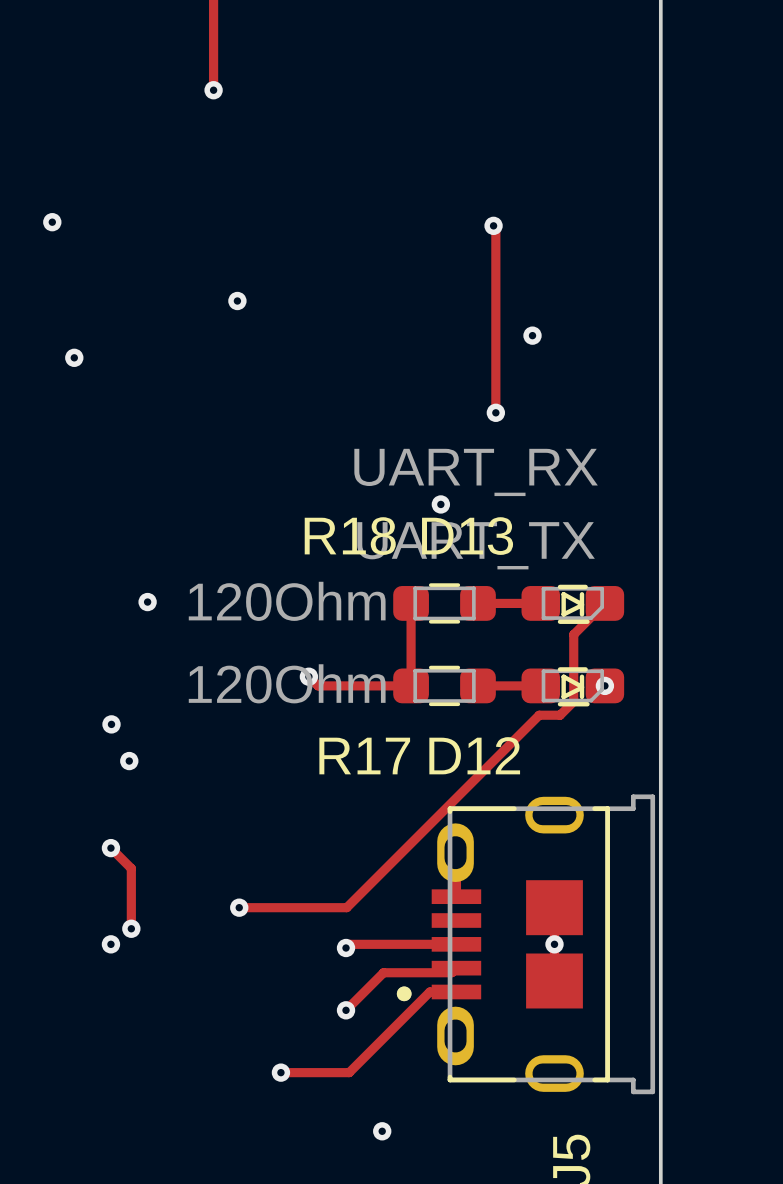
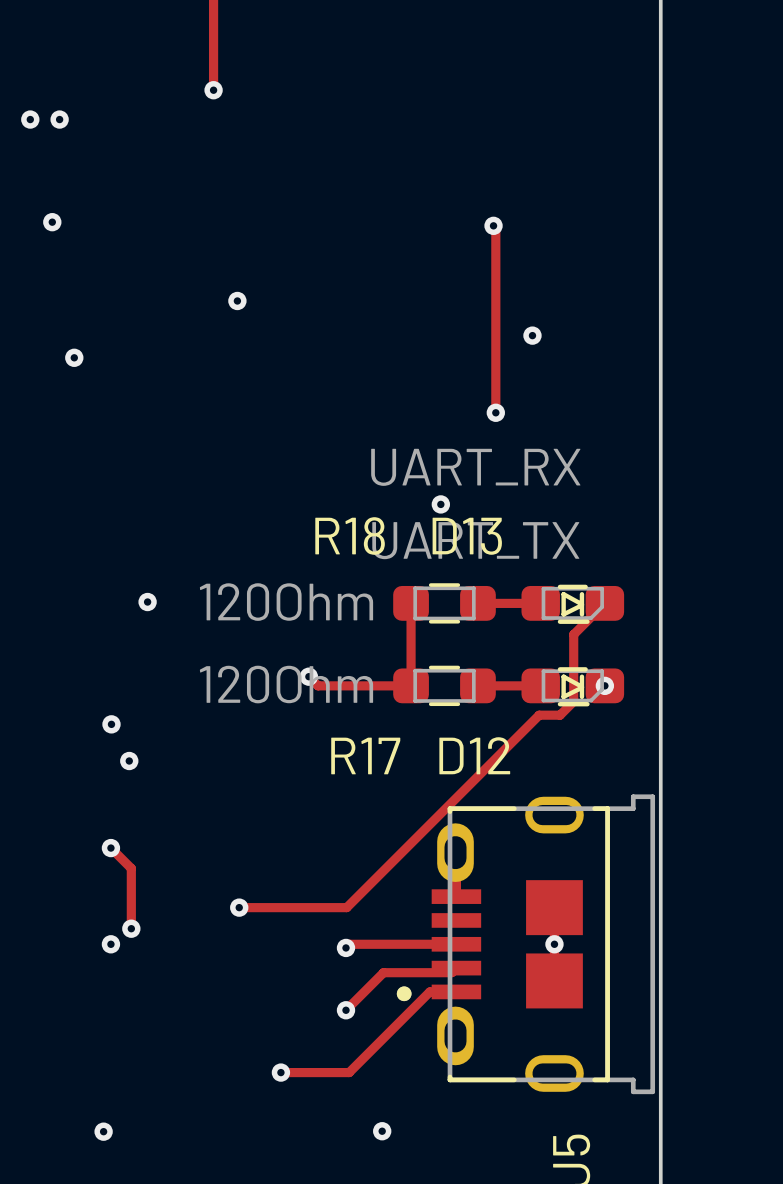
via: none -> (30, 119)
via: none -> (59, 119)
via: none -> (103, 1131)

